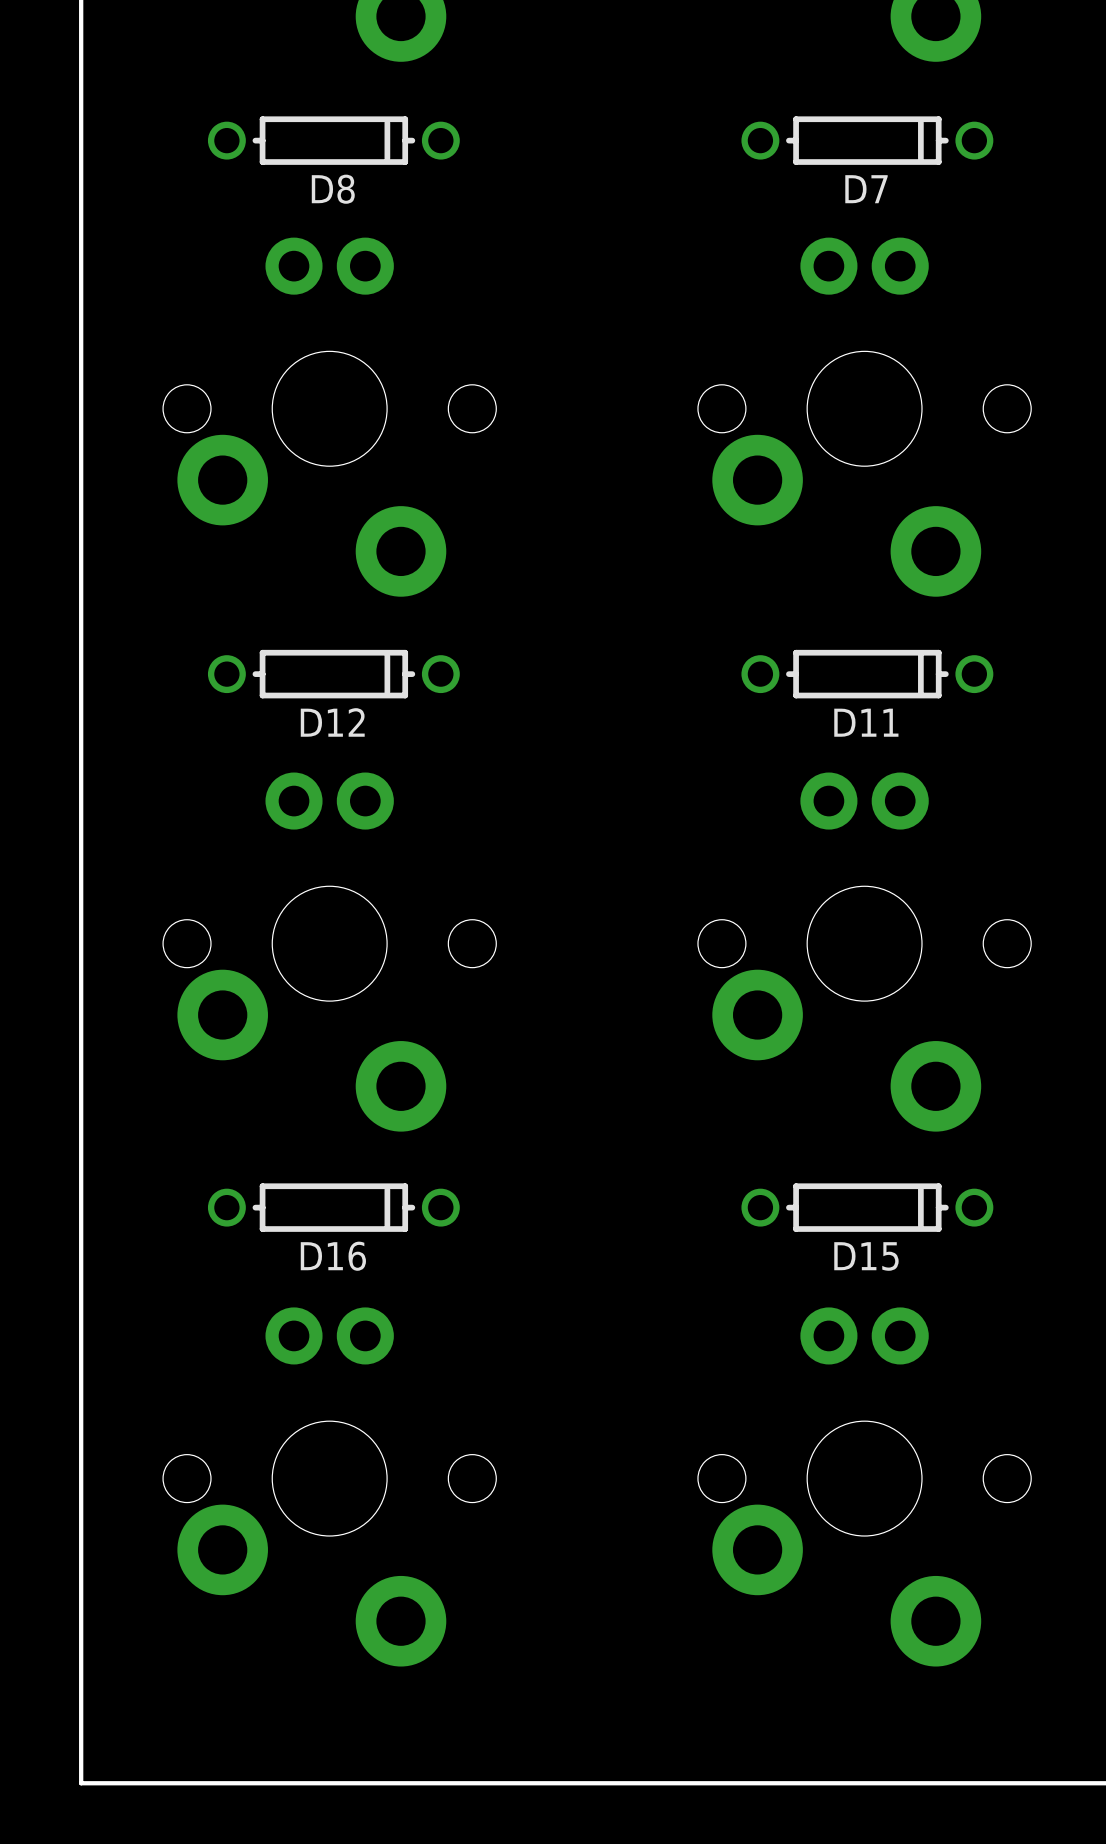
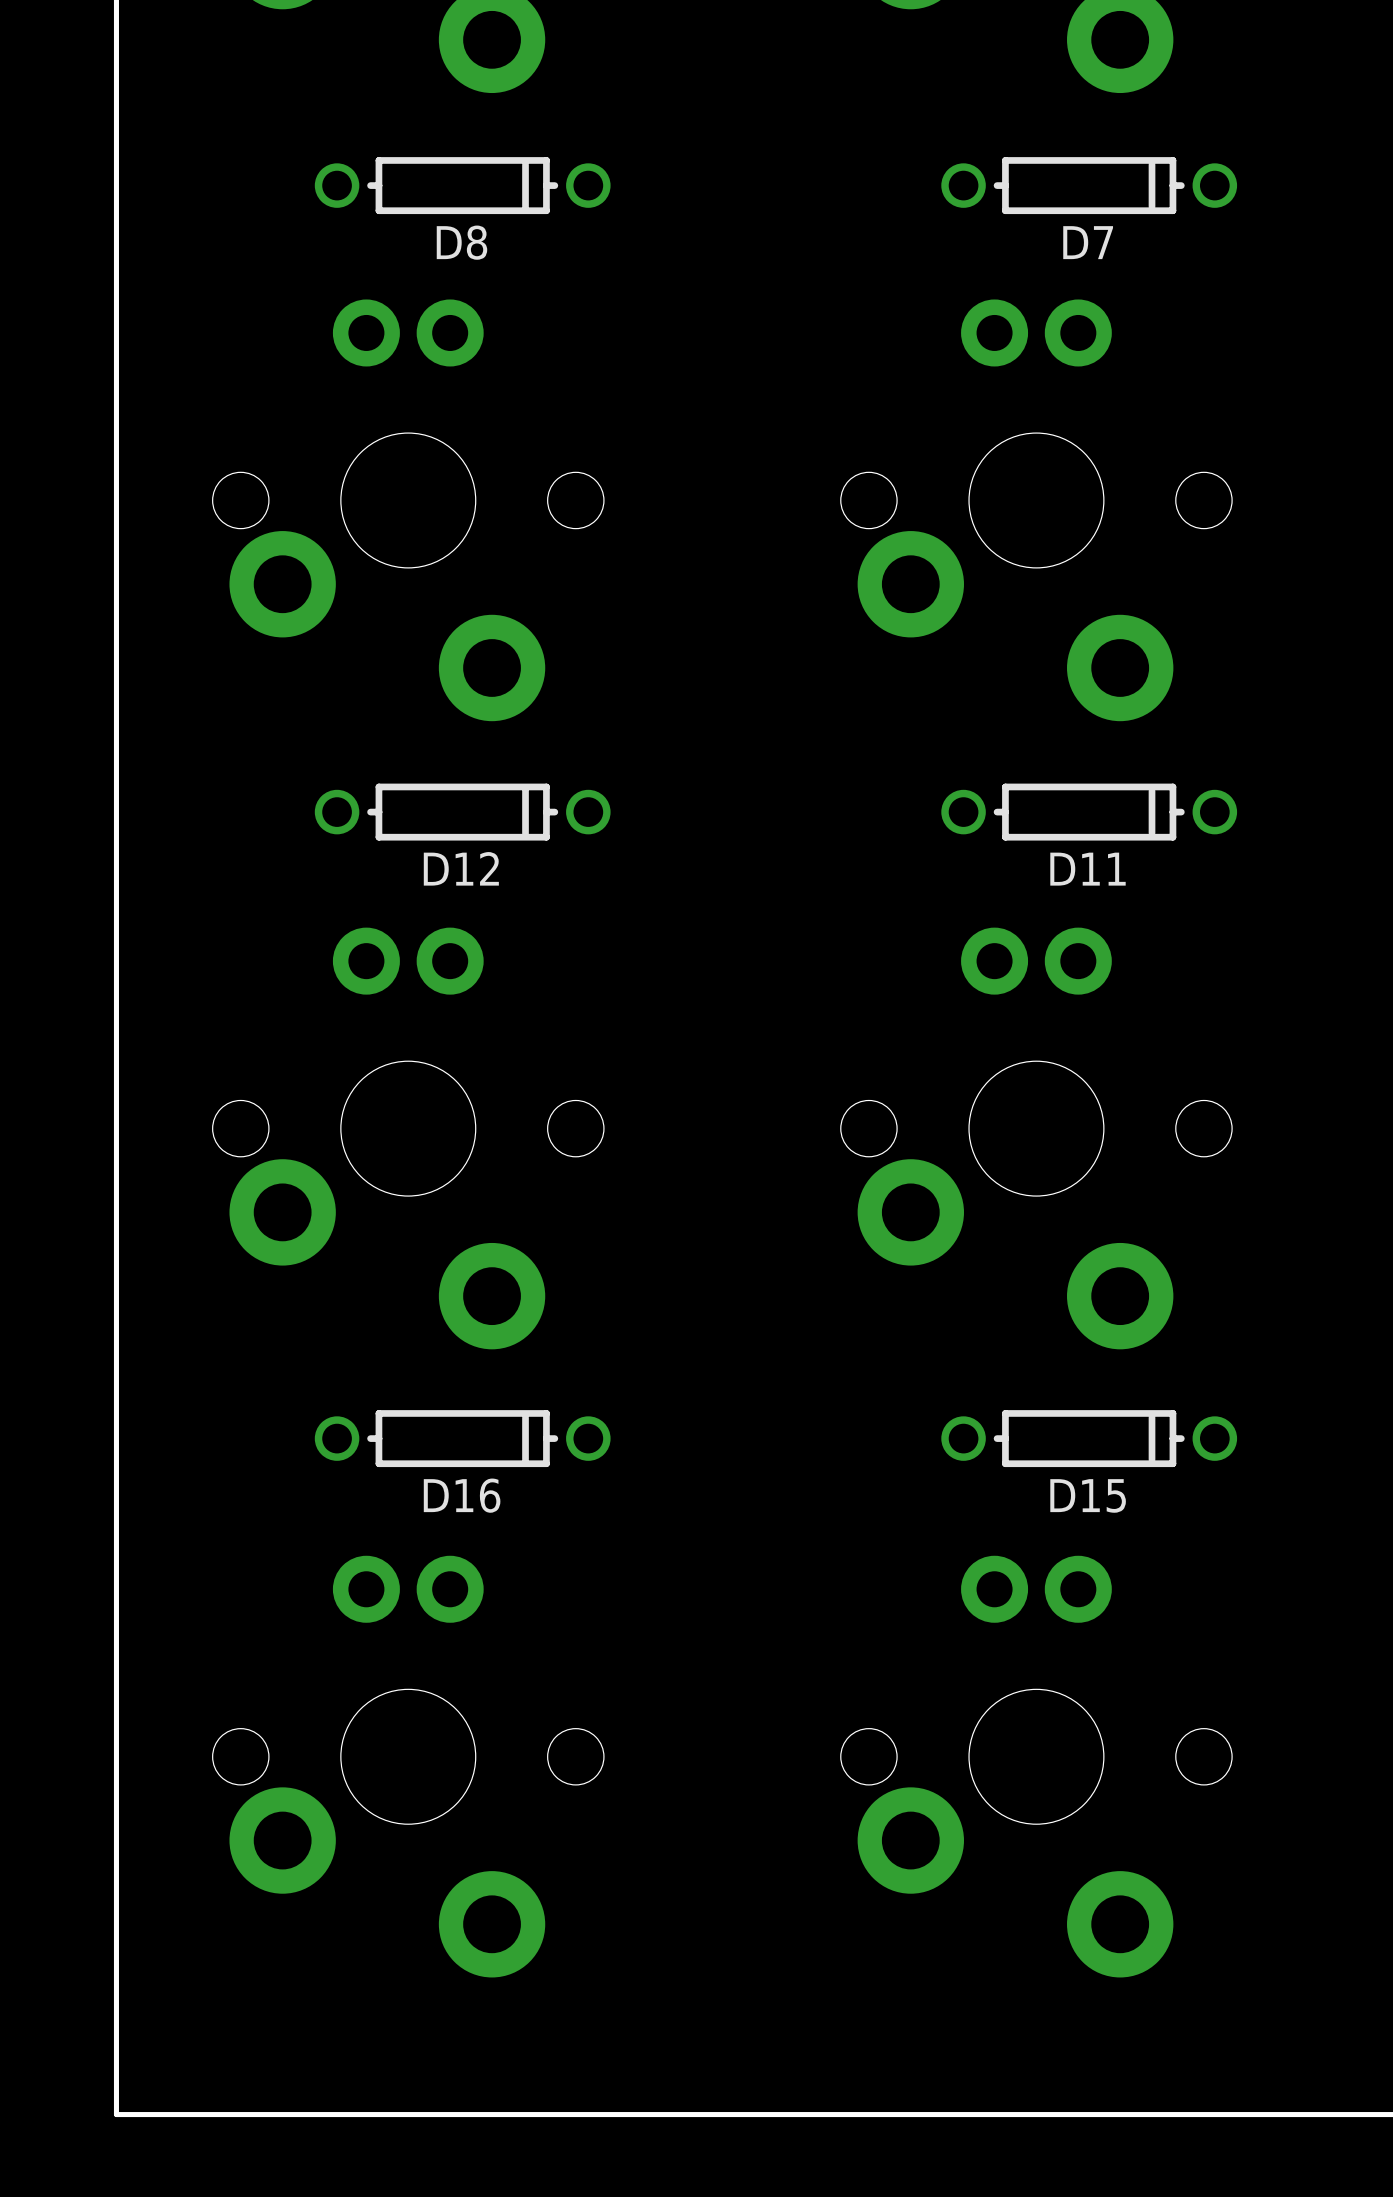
D8 position: (333, 140) -> (462, 185)
D7 position: (867, 140) -> (1089, 185)
D12 position: (333, 674) -> (462, 812)
D11 position: (867, 674) -> (1089, 812)
D16 position: (333, 1207) -> (462, 1438)
D15 position: (867, 1207) -> (1089, 1438)

